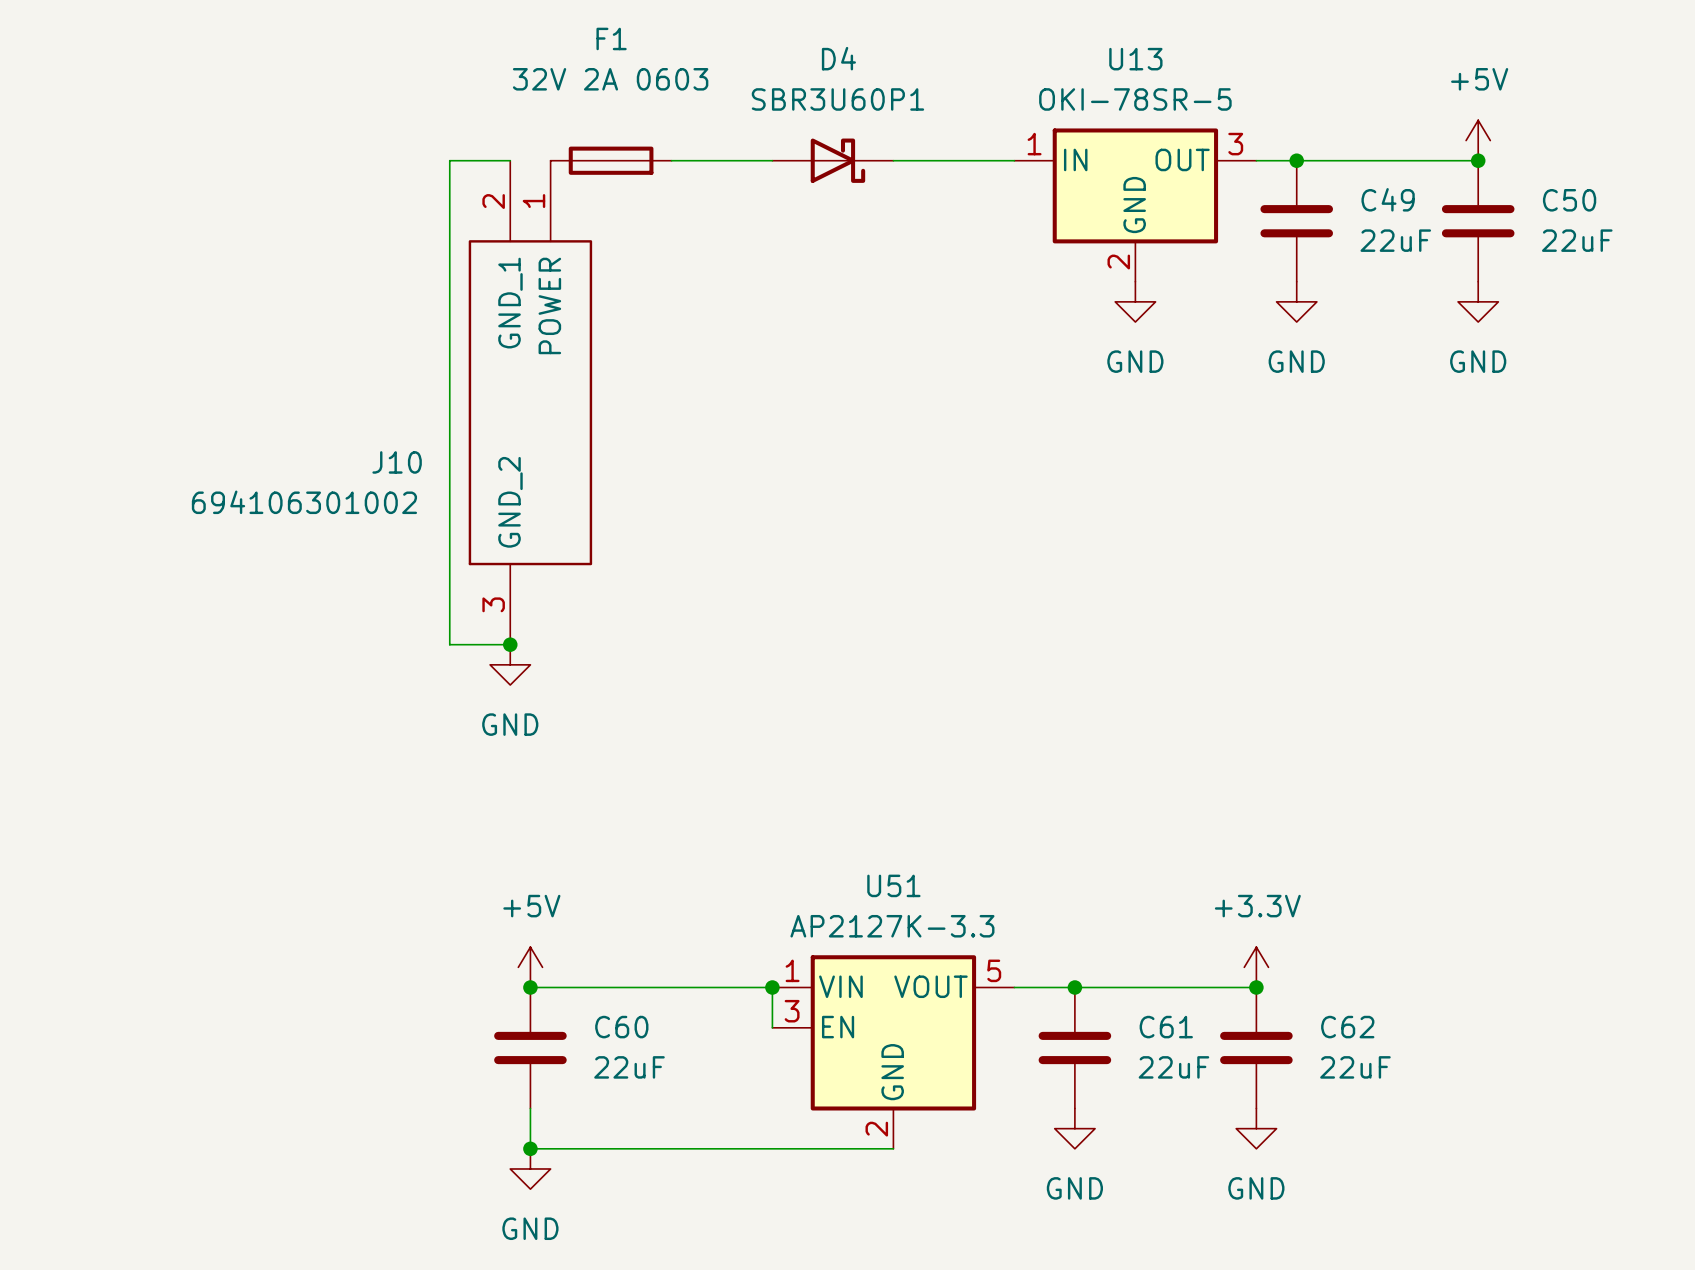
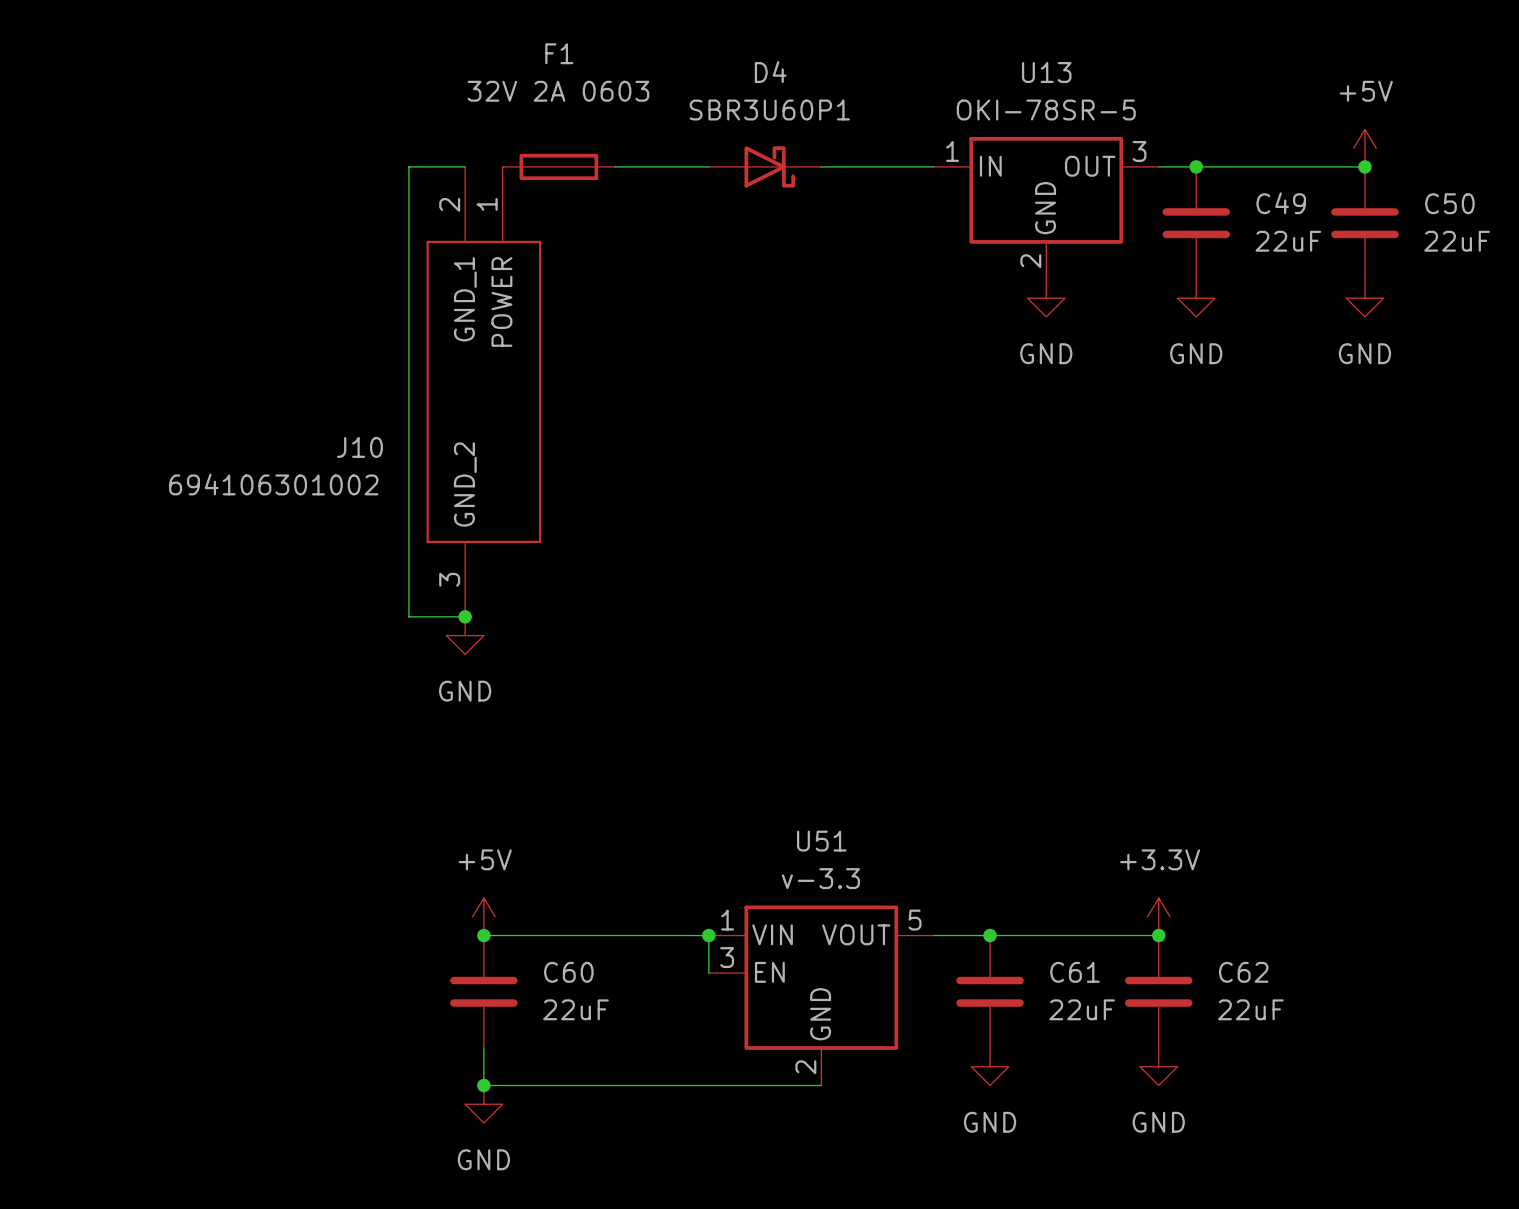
U51 value: AP2127K-3.3 (892, 926) -> v-3.3 (820, 878)

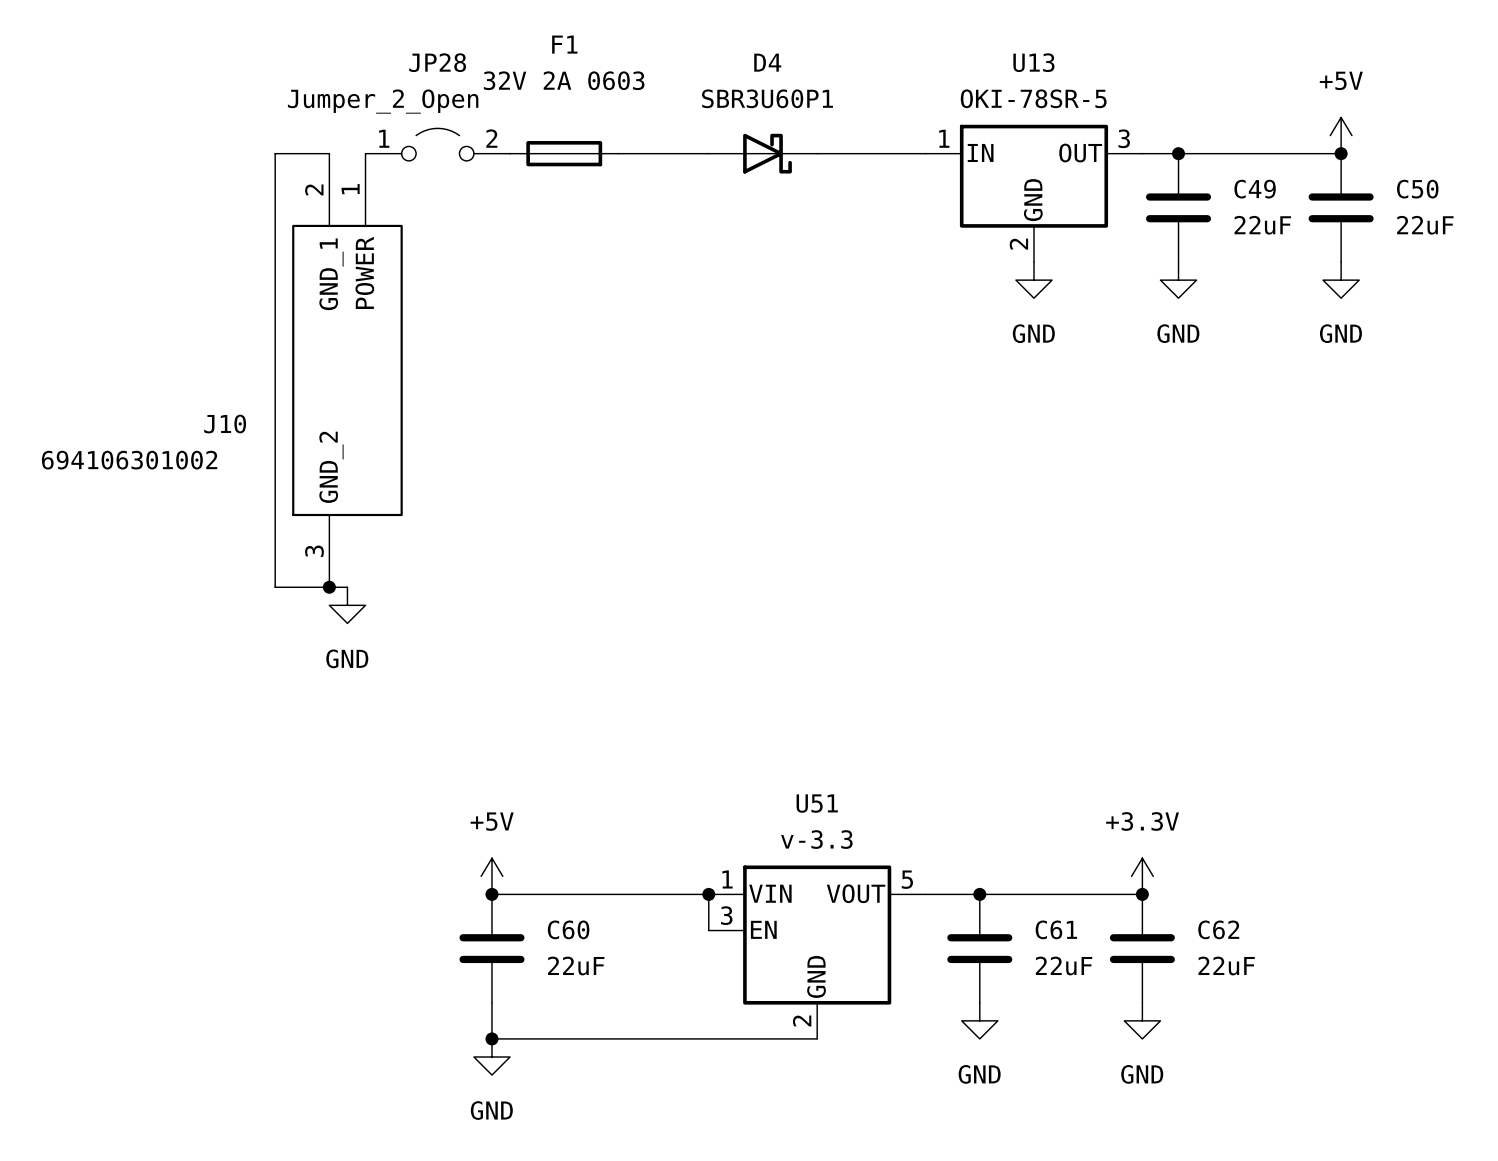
JP28: none -> Jumper_2_Open (437, 144)
wire: none -> (329, 153) (275, 153) (275, 587) (347, 587)
wire: (465, 166) (408, 166) (408, 616) (465, 616) -> none
J10 position: (483, 391) -> (347, 370)
junction: none -> (329, 587)
junction: (465, 616) -> none
power symbol position: GND (465, 635) -> GND (347, 605)

